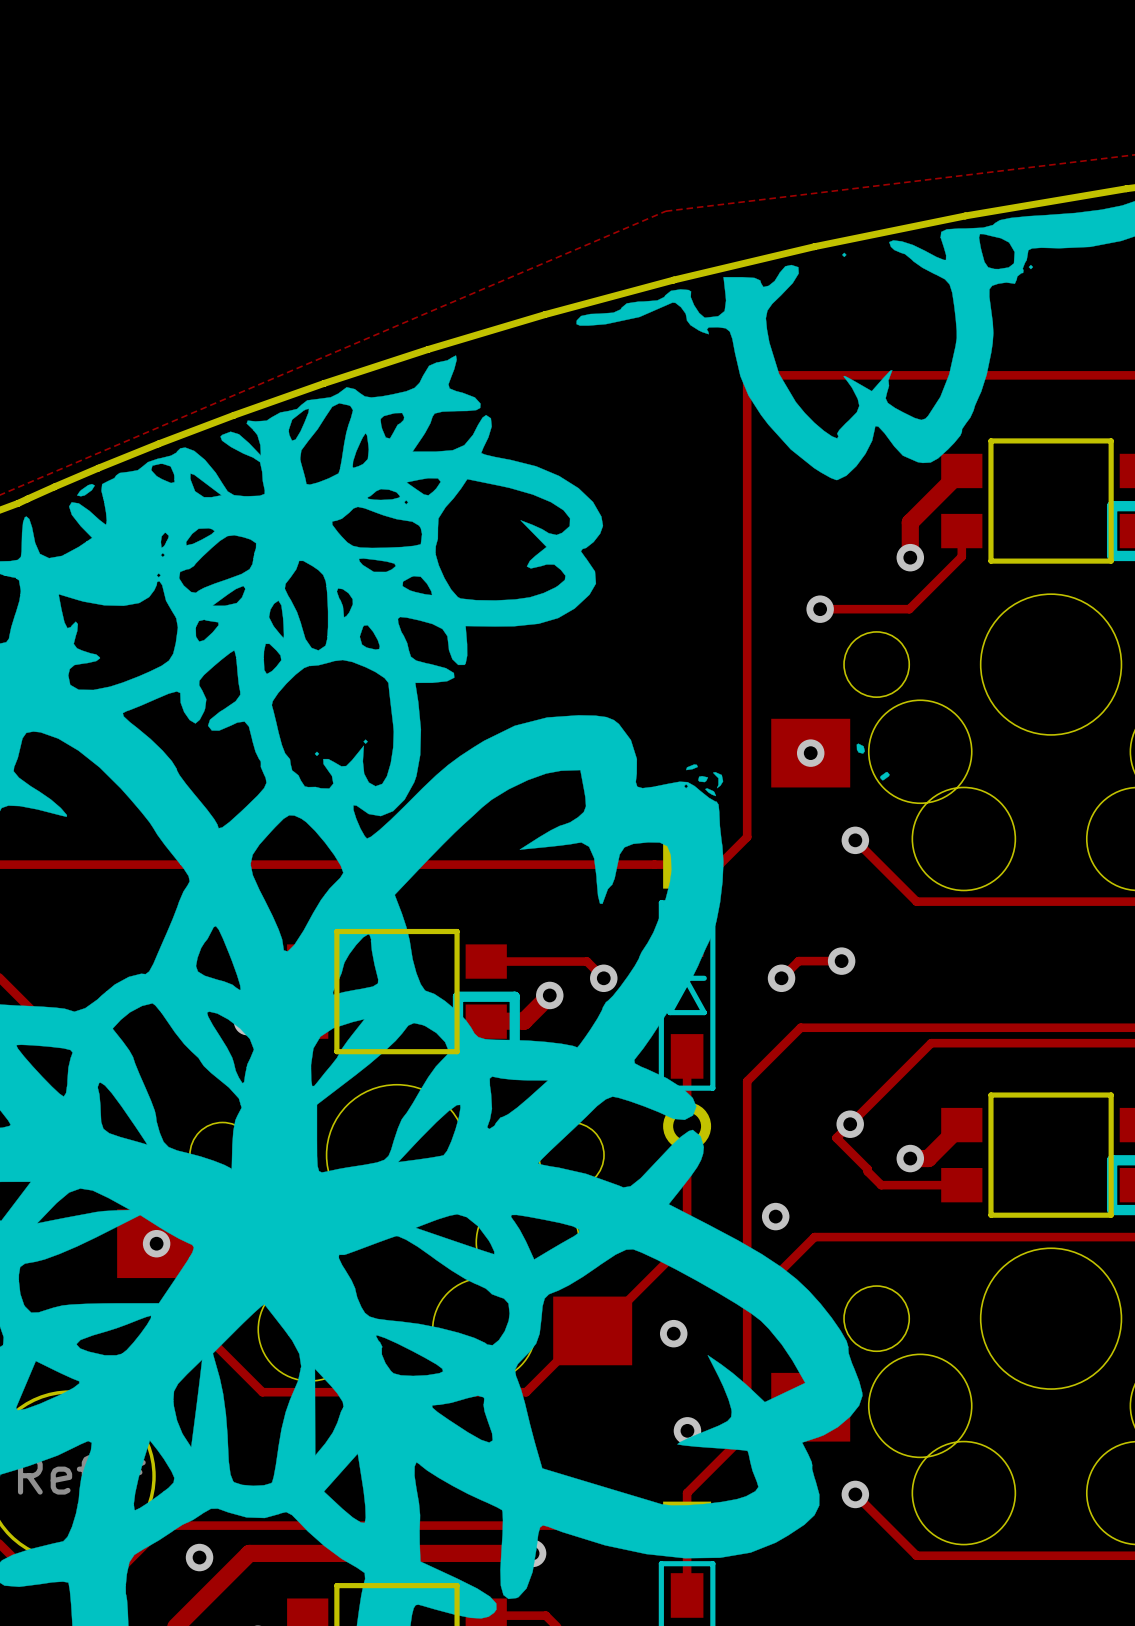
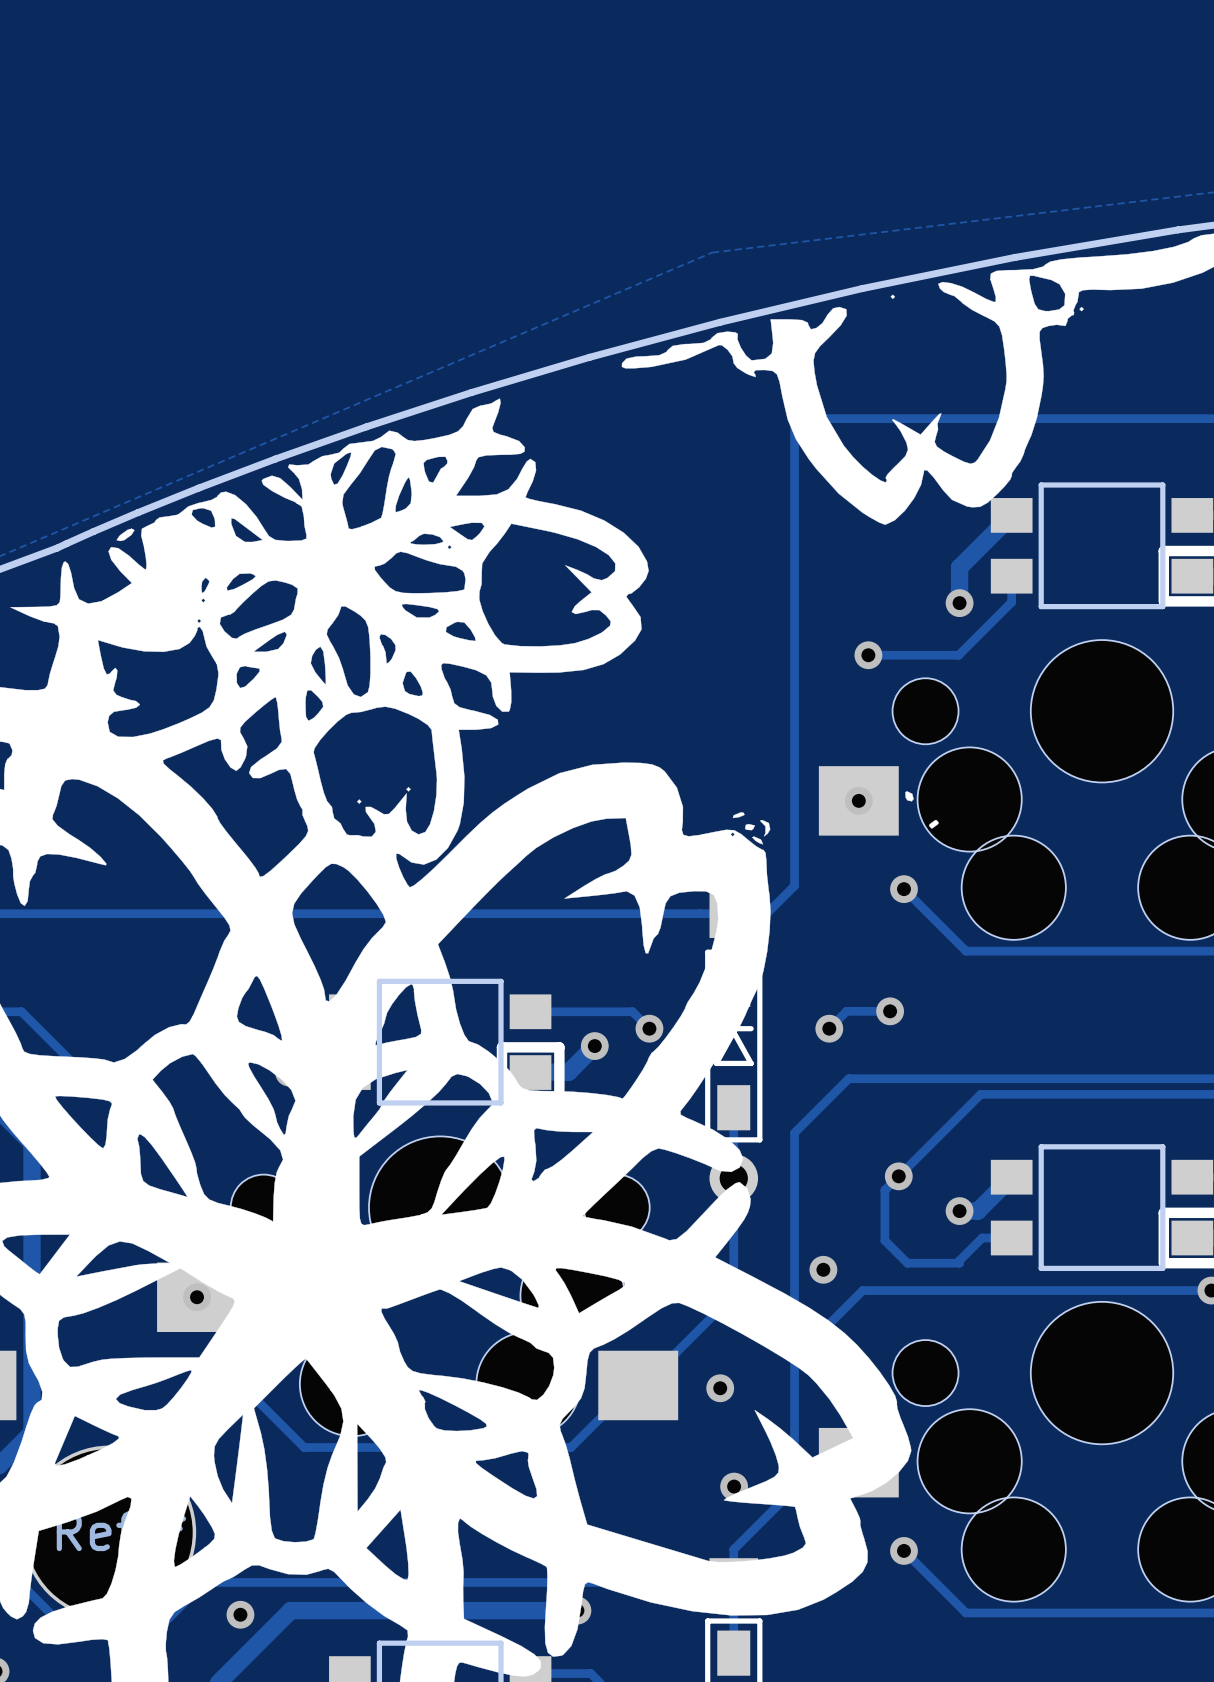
track: (836, 1137) (881, 1185) (932, 1185) -> (884, 1190) (884, 1240) (907, 1263) (959, 1263) (959, 1260) (982, 1238)

